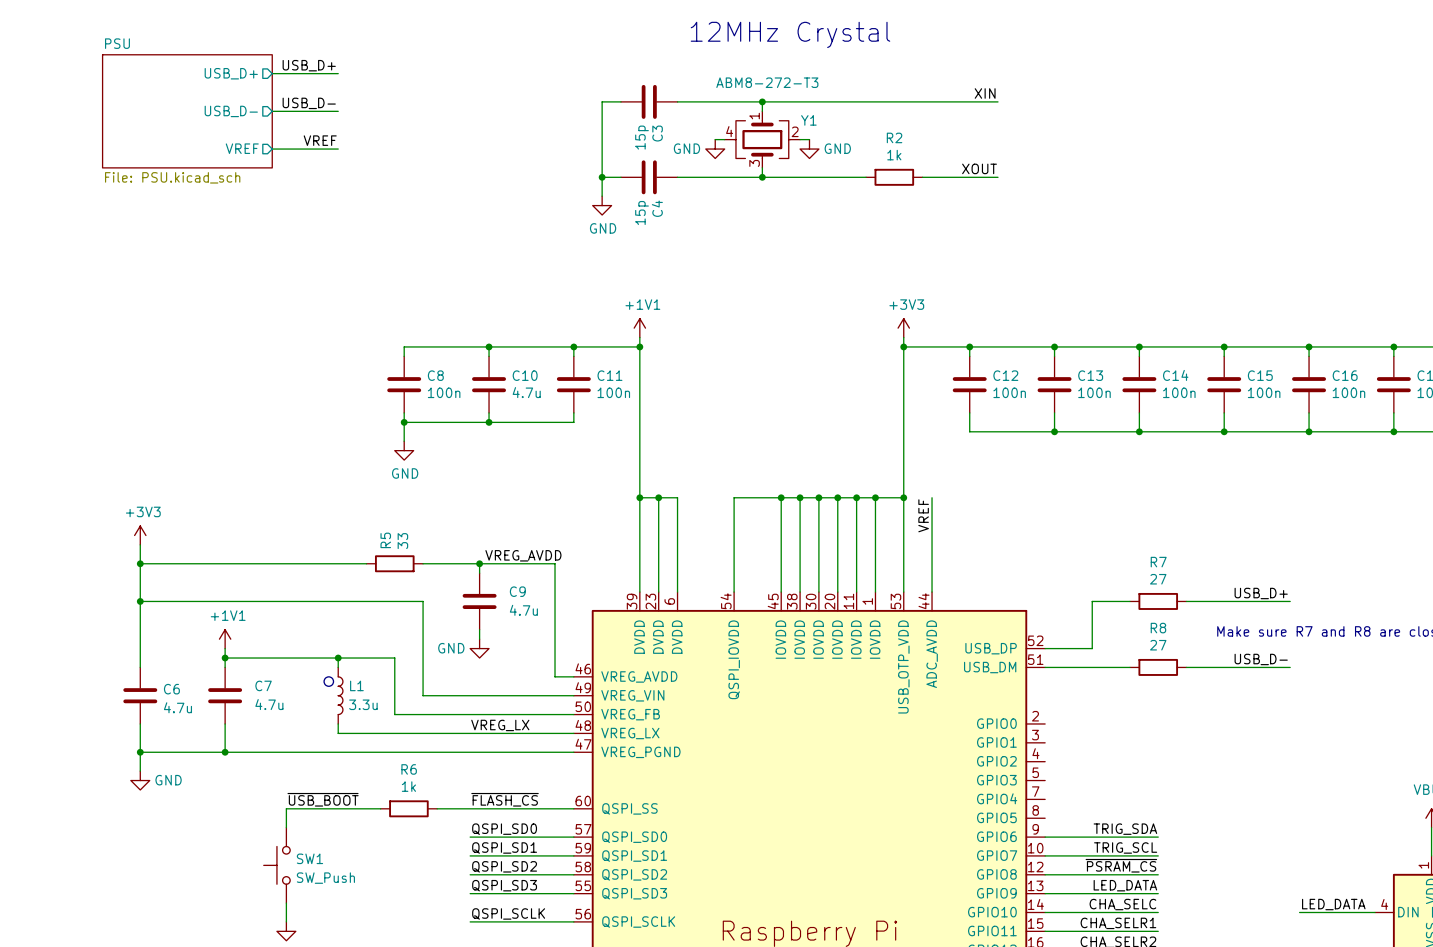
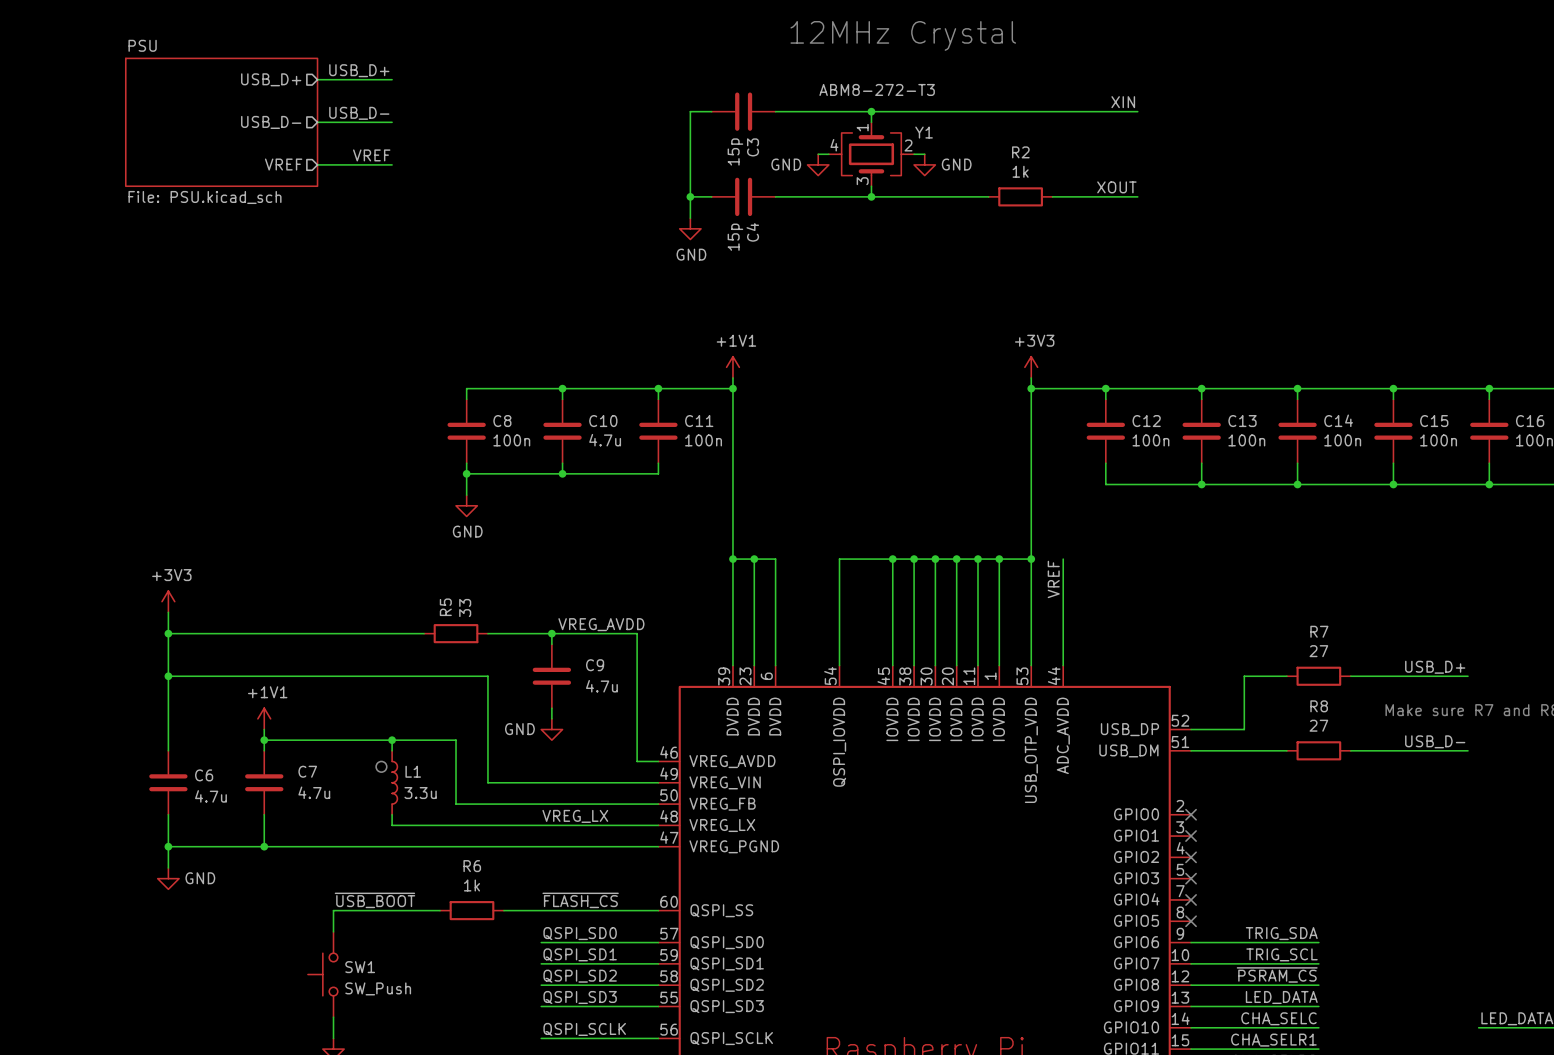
no-connect mark: none -> (1191, 814)
no-connect mark: none -> (1191, 836)
no-connect mark: none -> (1191, 857)
no-connect mark: none -> (1191, 878)
no-connect mark: none -> (1191, 899)
no-connect mark: none -> (1191, 921)

